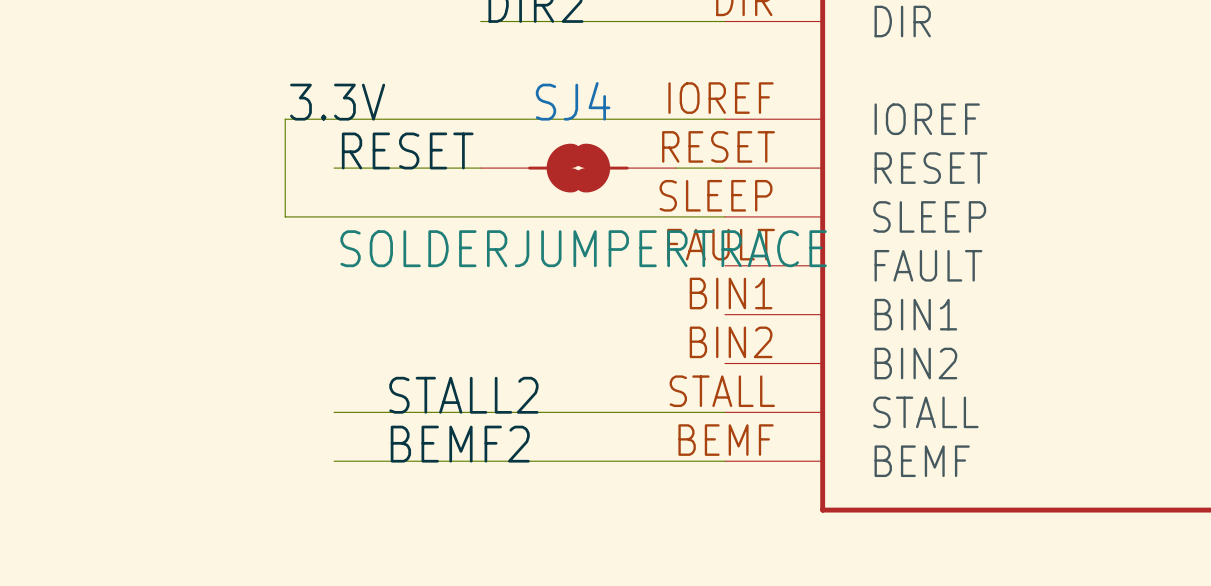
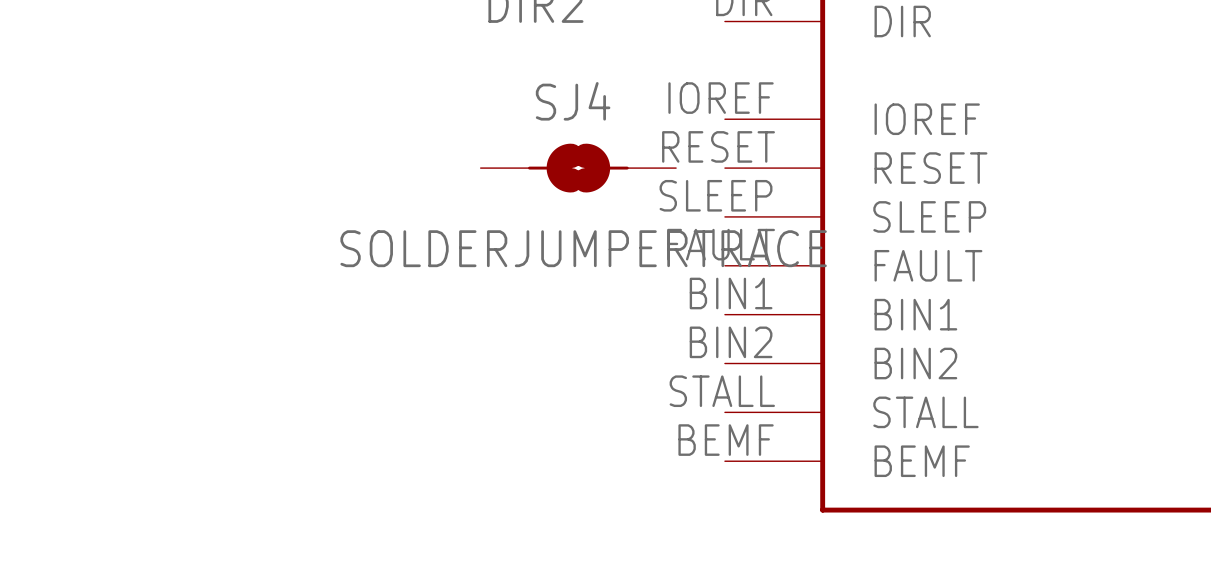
wire: (480, 21) (724, 21) -> none
label: 3.3V (337, 102) -> none
wire: (724, 119) (285, 119) (285, 216) (724, 216) -> none
label: RESET (407, 150) -> none
wire: (334, 168) (480, 168) -> none
wire: (676, 168) (724, 168) -> none
label: STALL2 (463, 395) -> none
wire: (334, 412) (724, 412) -> none
label: BEMF2 (460, 444) -> none
wire: (334, 461) (724, 461) -> none

